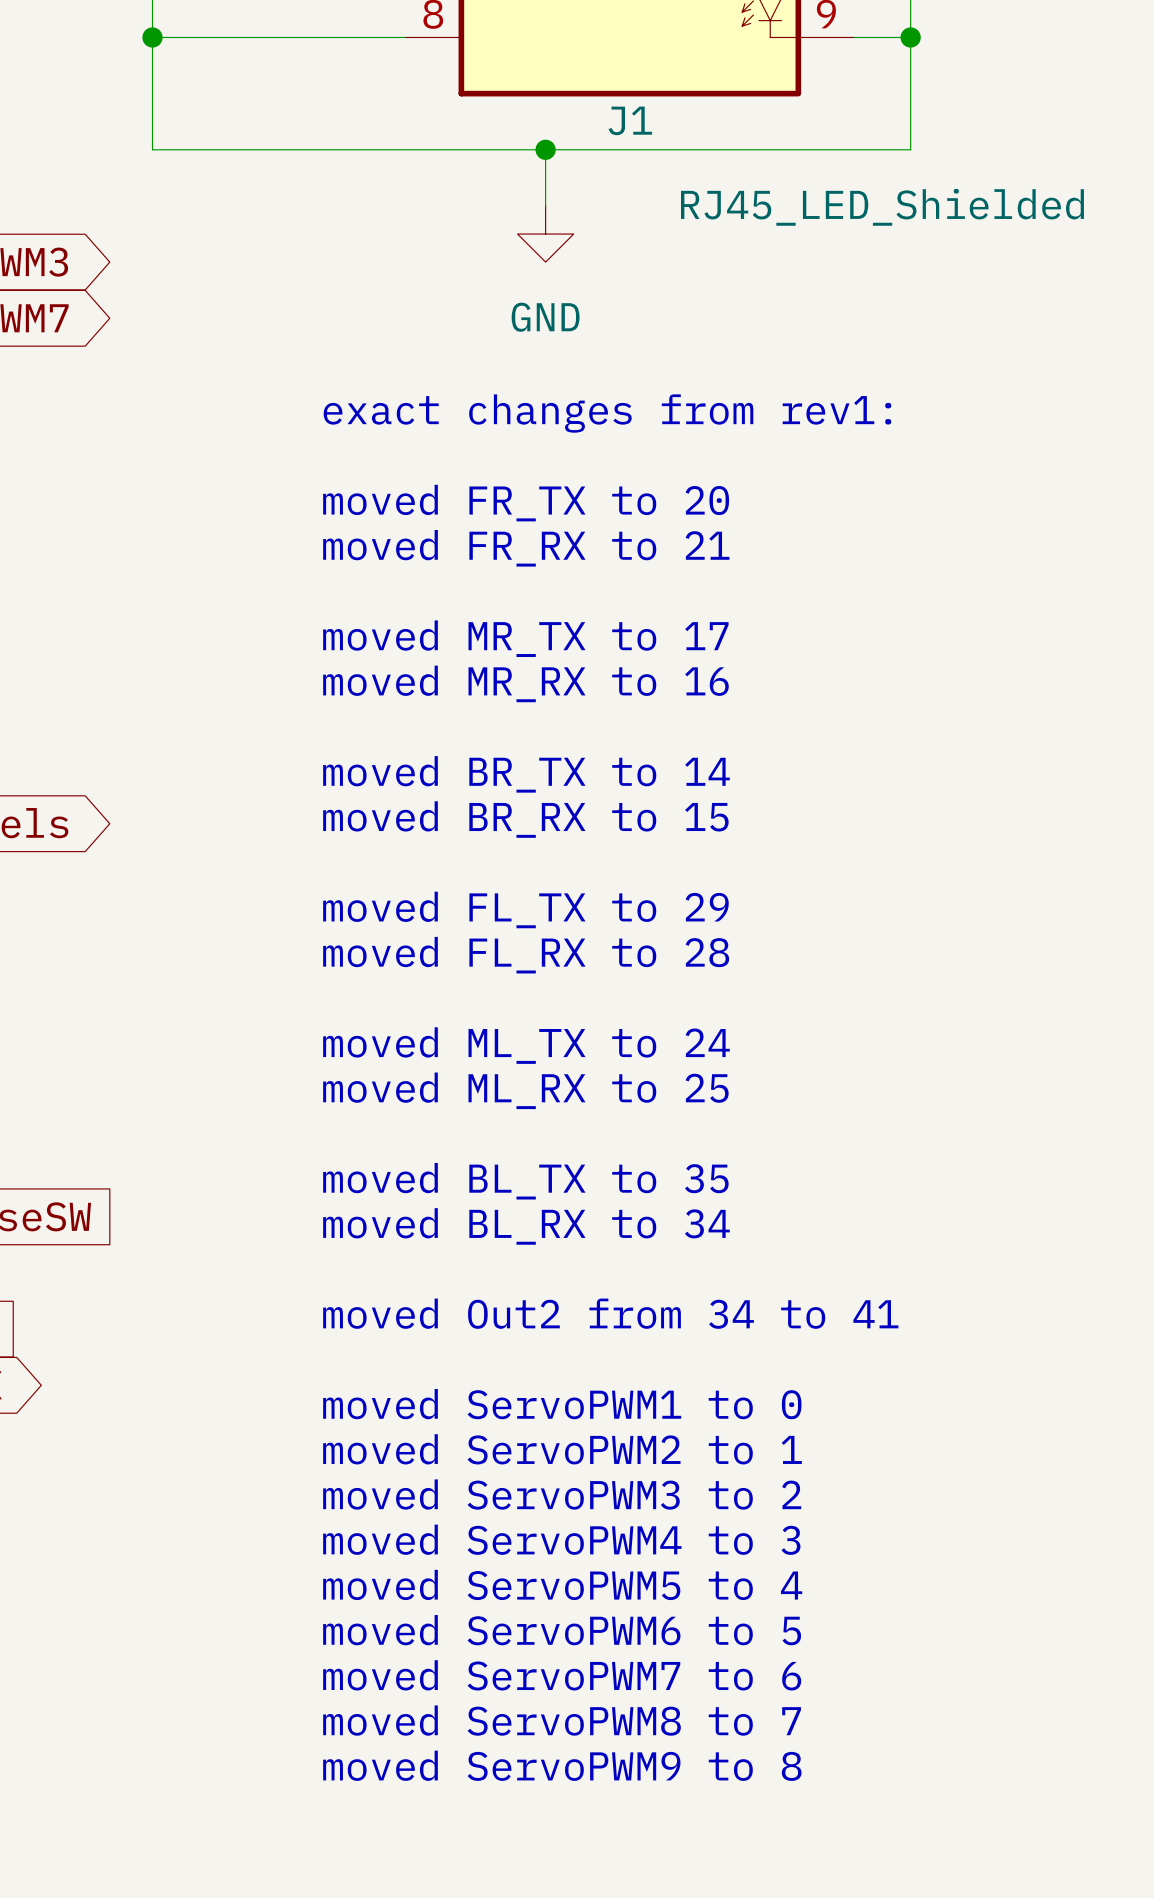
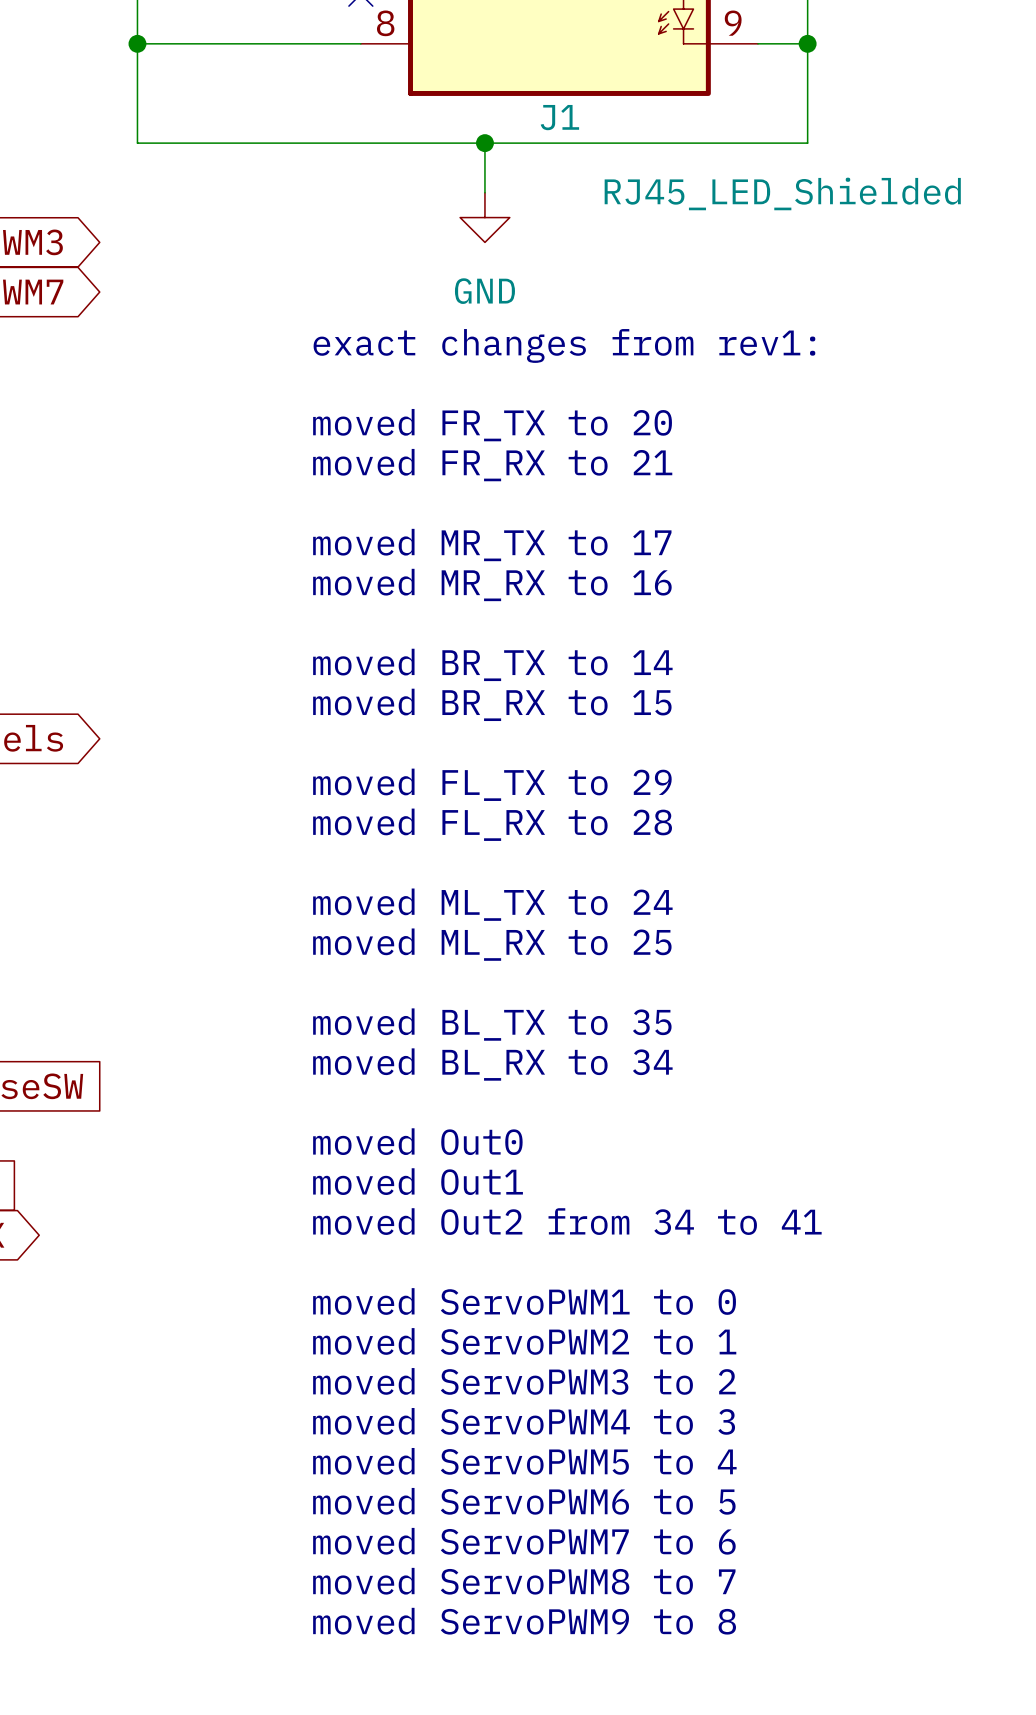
text position: exact changes from rev1: (607, 413) -> exact changes from rev1: (564, 345)
text position: moved FR_TX to 20 (526, 503) -> moved FR_TX to 20 (492, 425)
text position: moved FR_RX to 21 (526, 548) -> moved FR_RX to 21 (492, 465)
text position: moved MR_TX to 17 (525, 638) -> moved MR_TX to 17 (492, 545)
text position: moved MR_RX to 16 (525, 683) -> moved MR_RX to 16 (492, 584)
text position: moved BR_TX to 14 (526, 774) -> moved BR_TX to 14 (492, 664)
text position: moved BR_RX to 15 (525, 819) -> moved BR_RX to 15 (492, 704)
text position: moved FL_TX to 29 (525, 909) -> moved FL_TX to 29 (492, 784)
text position: moved FL_RX to 28 (526, 955) -> moved FL_RX to 28 (492, 824)
text position: moved ML_TX to 24 (526, 1045) -> moved ML_TX to 24 (492, 904)
text position: moved ML_RX to 25 (525, 1090) -> moved ML_RX to 25 (492, 944)
text position: moved BL_TX to 35 (525, 1181) -> moved BL_TX to 35 (492, 1024)
text position: moved BL_RX to 34 (526, 1226) -> moved BL_RX to 34 (492, 1064)
text: none -> moved Out0 (417, 1141)
text position: moved Out2 from 34 to 41 (610, 1313) -> moved Out2 from 34 to 41 (567, 1221)
text: none -> moved Out1 (418, 1181)
text position: moved ServoPWM1 to 0 (562, 1404) -> moved ServoPWM1 to 0 (524, 1301)
text position: moved ServoPWM2 to 1 (562, 1449) -> moved ServoPWM2 to 1 (524, 1341)
text position: moved ServoPWM3 to 2 (562, 1494) -> moved ServoPWM3 to 2 (524, 1381)
text position: moved ServoPWM4 to 3 (561, 1539) -> moved ServoPWM4 to 3 (524, 1421)
text position: moved ServoPWM5 to 4 (562, 1584) -> moved ServoPWM5 to 4 (524, 1461)
text position: moved ServoPWM6 to 5 (562, 1630) -> moved ServoPWM6 to 5 (524, 1501)
text position: moved ServoPWM7 to 6 (562, 1675) -> moved ServoPWM7 to 6 (524, 1541)
text position: moved ServoPWM8 to 7 (562, 1720) -> moved ServoPWM8 to 7 (524, 1581)
text position: moved ServoPWM9 to 8 (562, 1765) -> moved ServoPWM9 to 8 (524, 1621)

